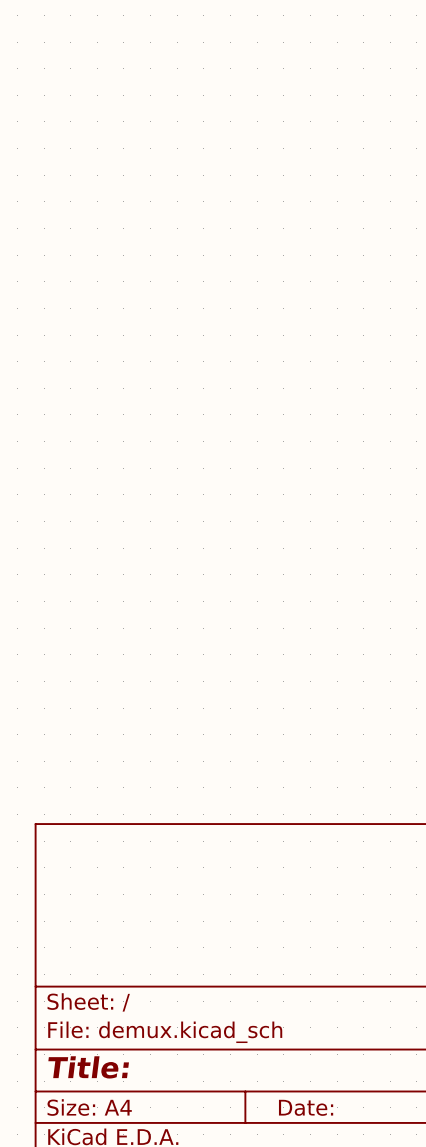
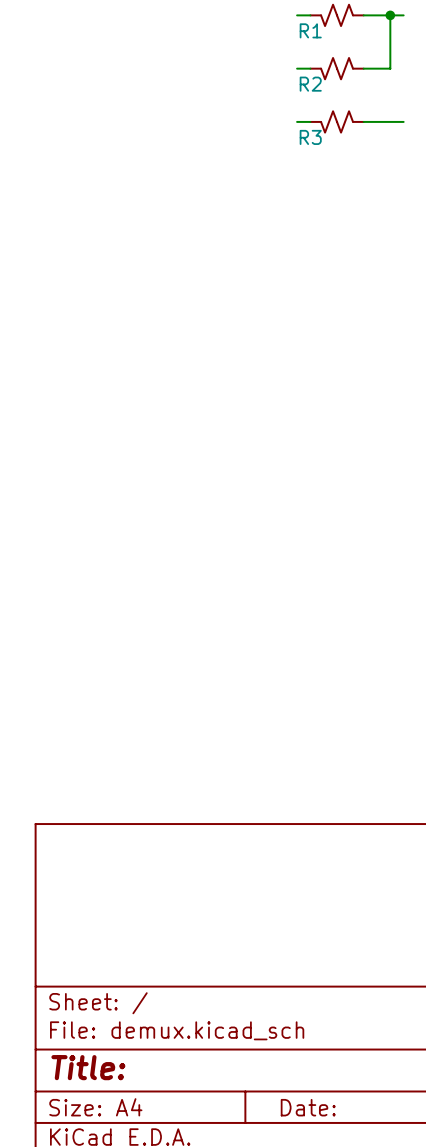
wire: none -> (297, 15) (310, 15)
R1: none -> (337, 15)
wire: none -> (363, 15) (403, 15)
wire: none -> (390, 15) (390, 68) (363, 68)
junction: none -> (390, 15)
wire: none -> (297, 68) (310, 68)
R2: none -> (337, 68)
wire: none -> (297, 121) (310, 121)
R3: none -> (337, 121)
wire: none -> (363, 121) (403, 121)

